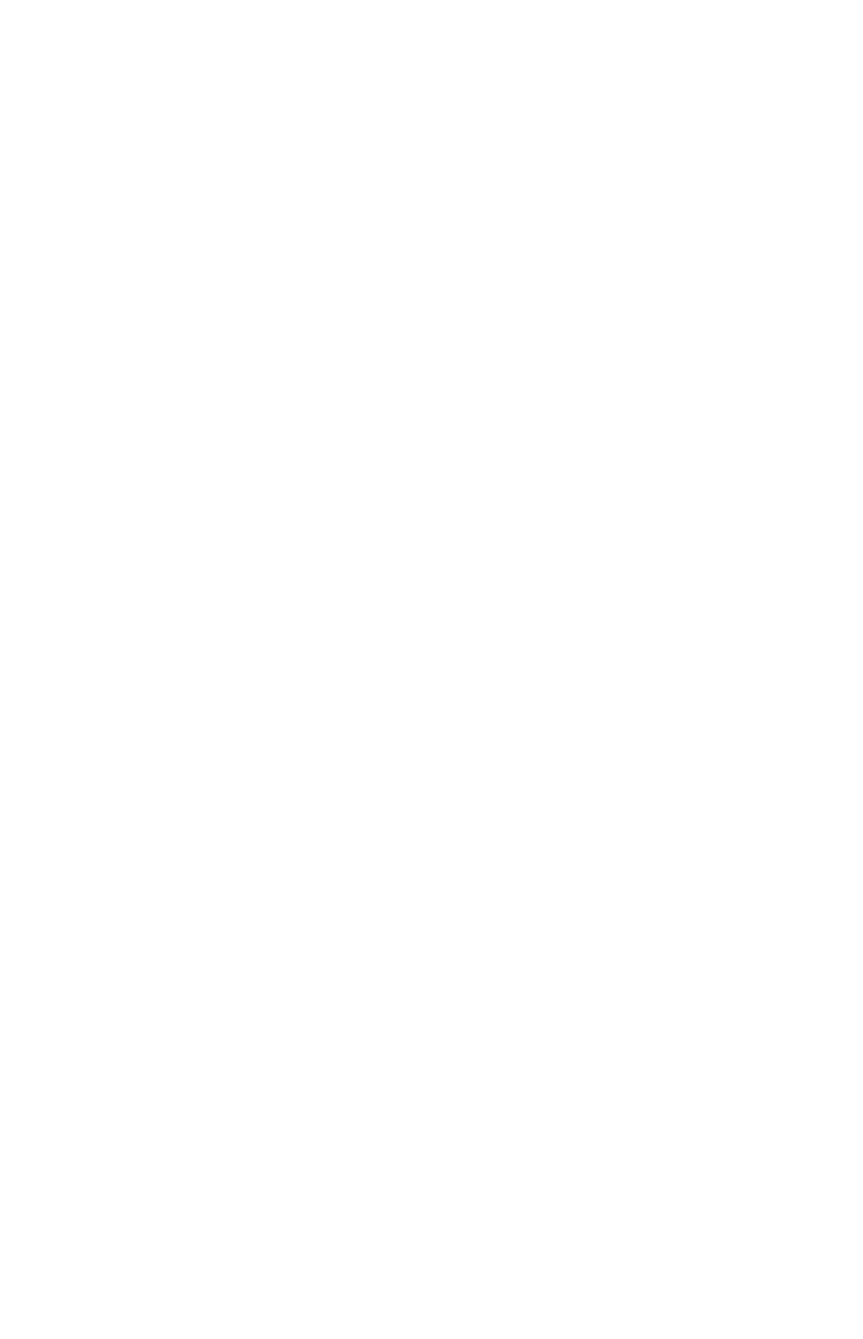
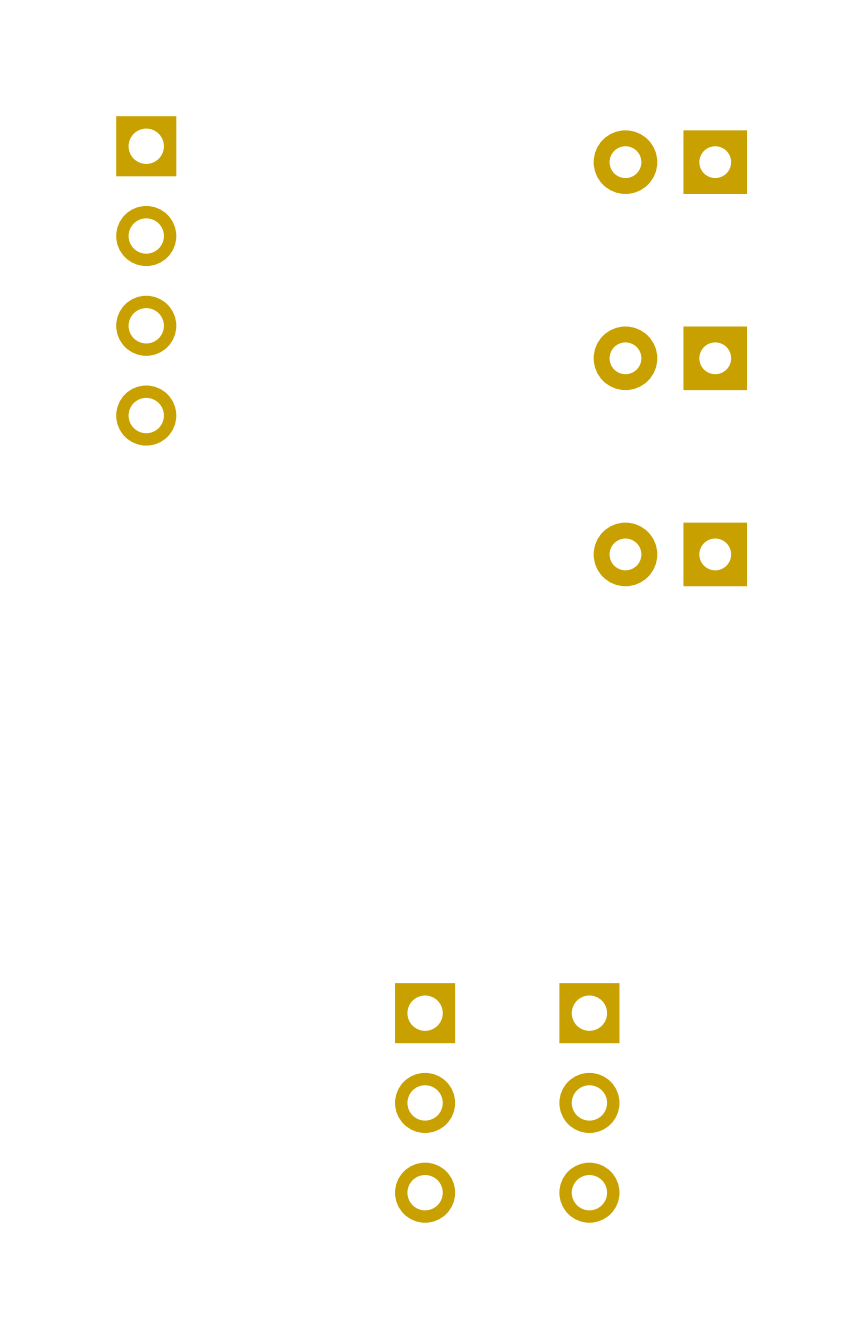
part: none -> (670, 162)
part: none -> (146, 280)
part: none -> (670, 358)
part: none -> (670, 554)
part: none -> (425, 1102)
part: none -> (589, 1102)

